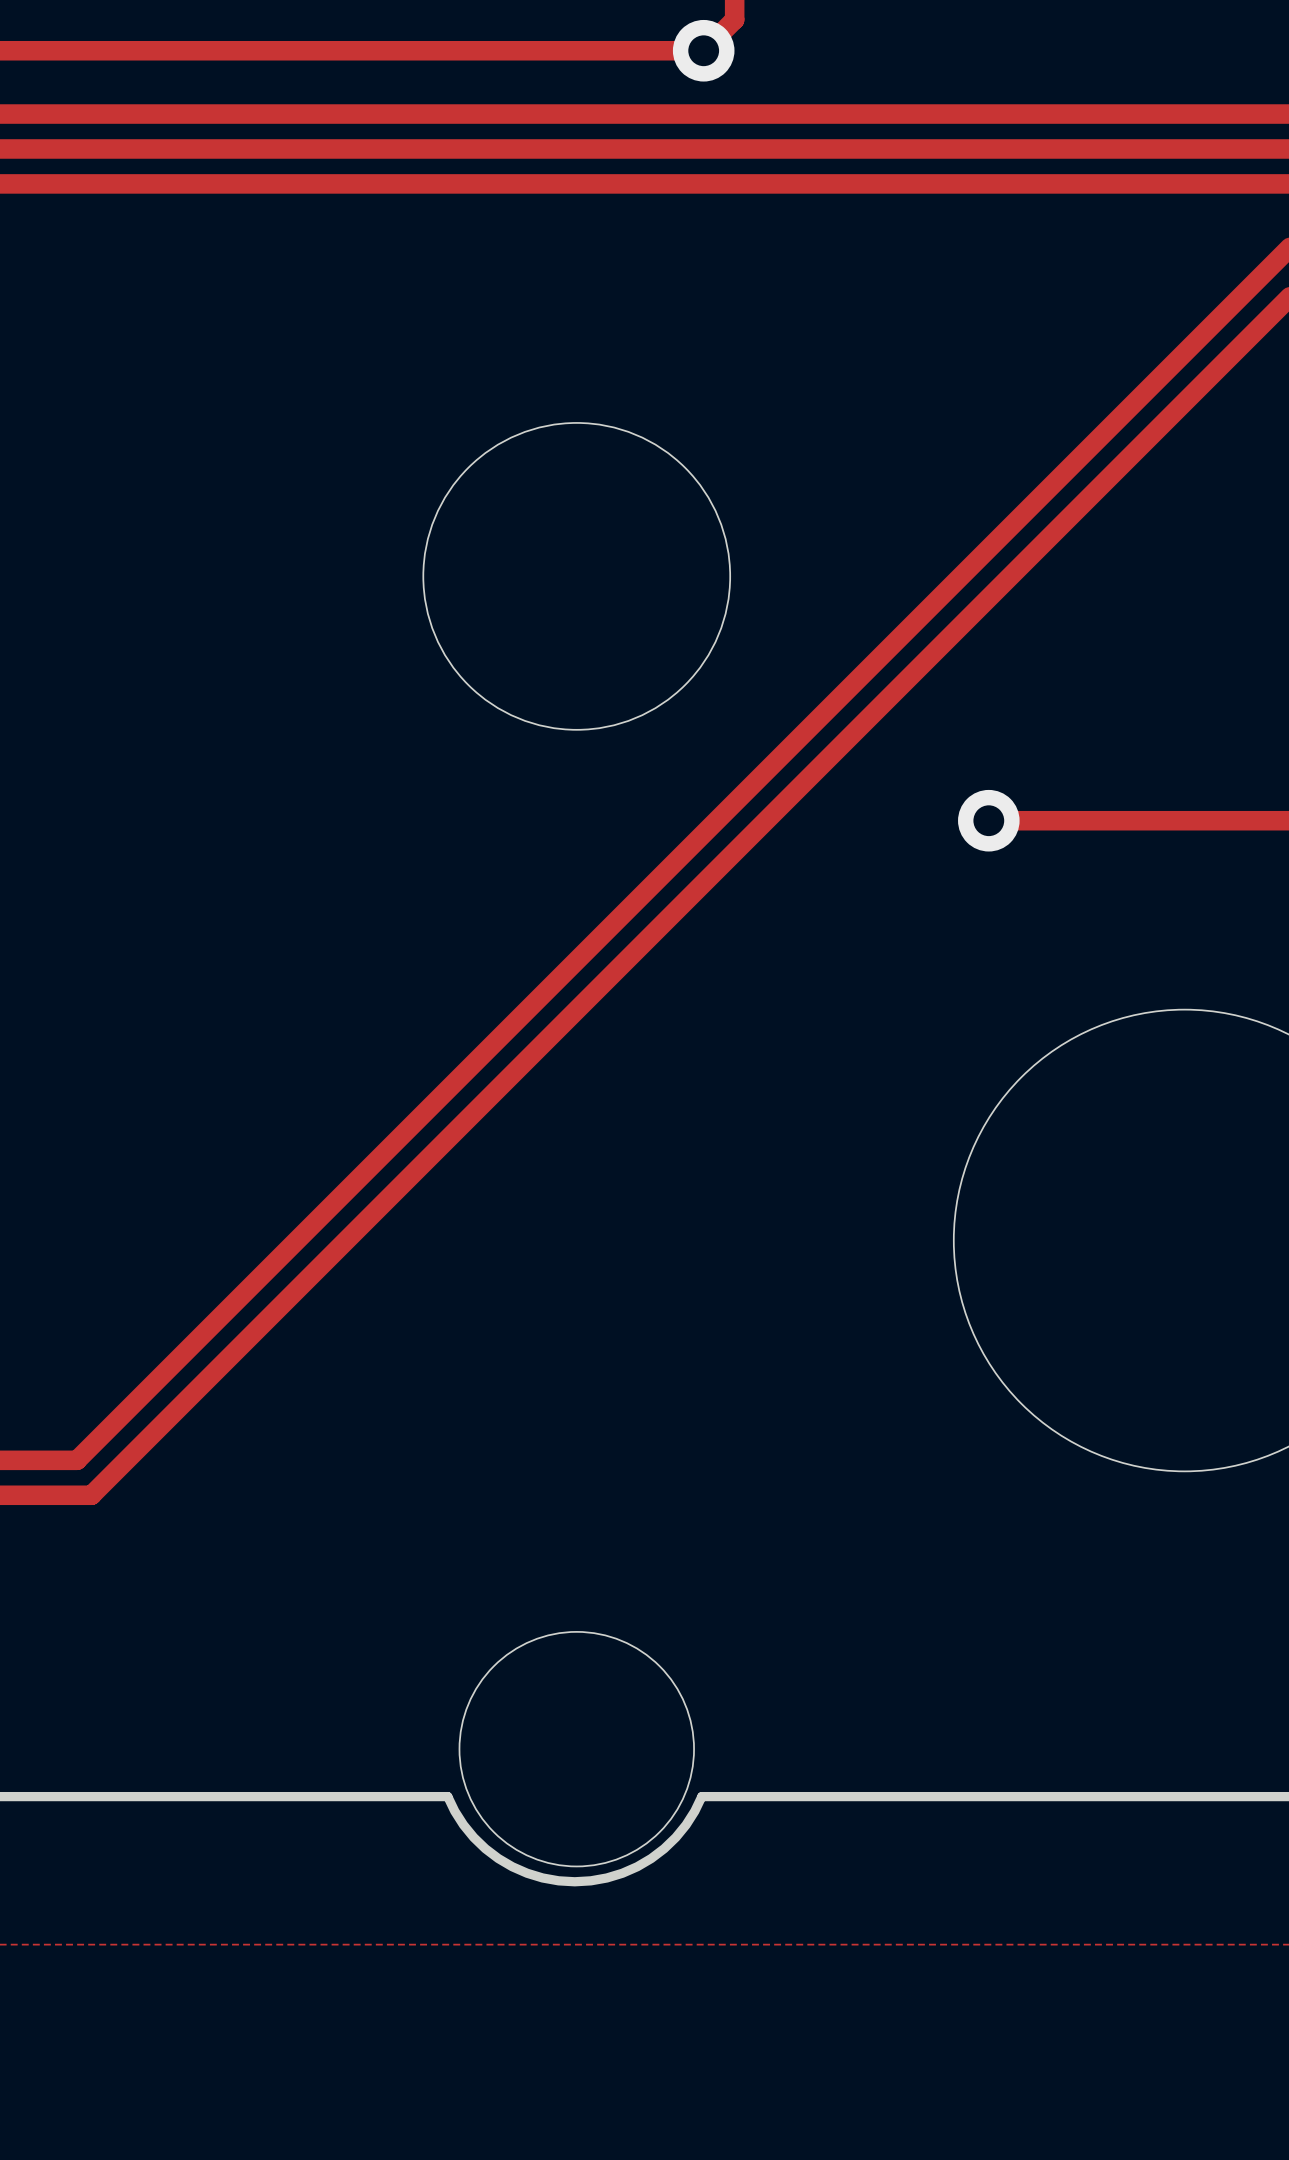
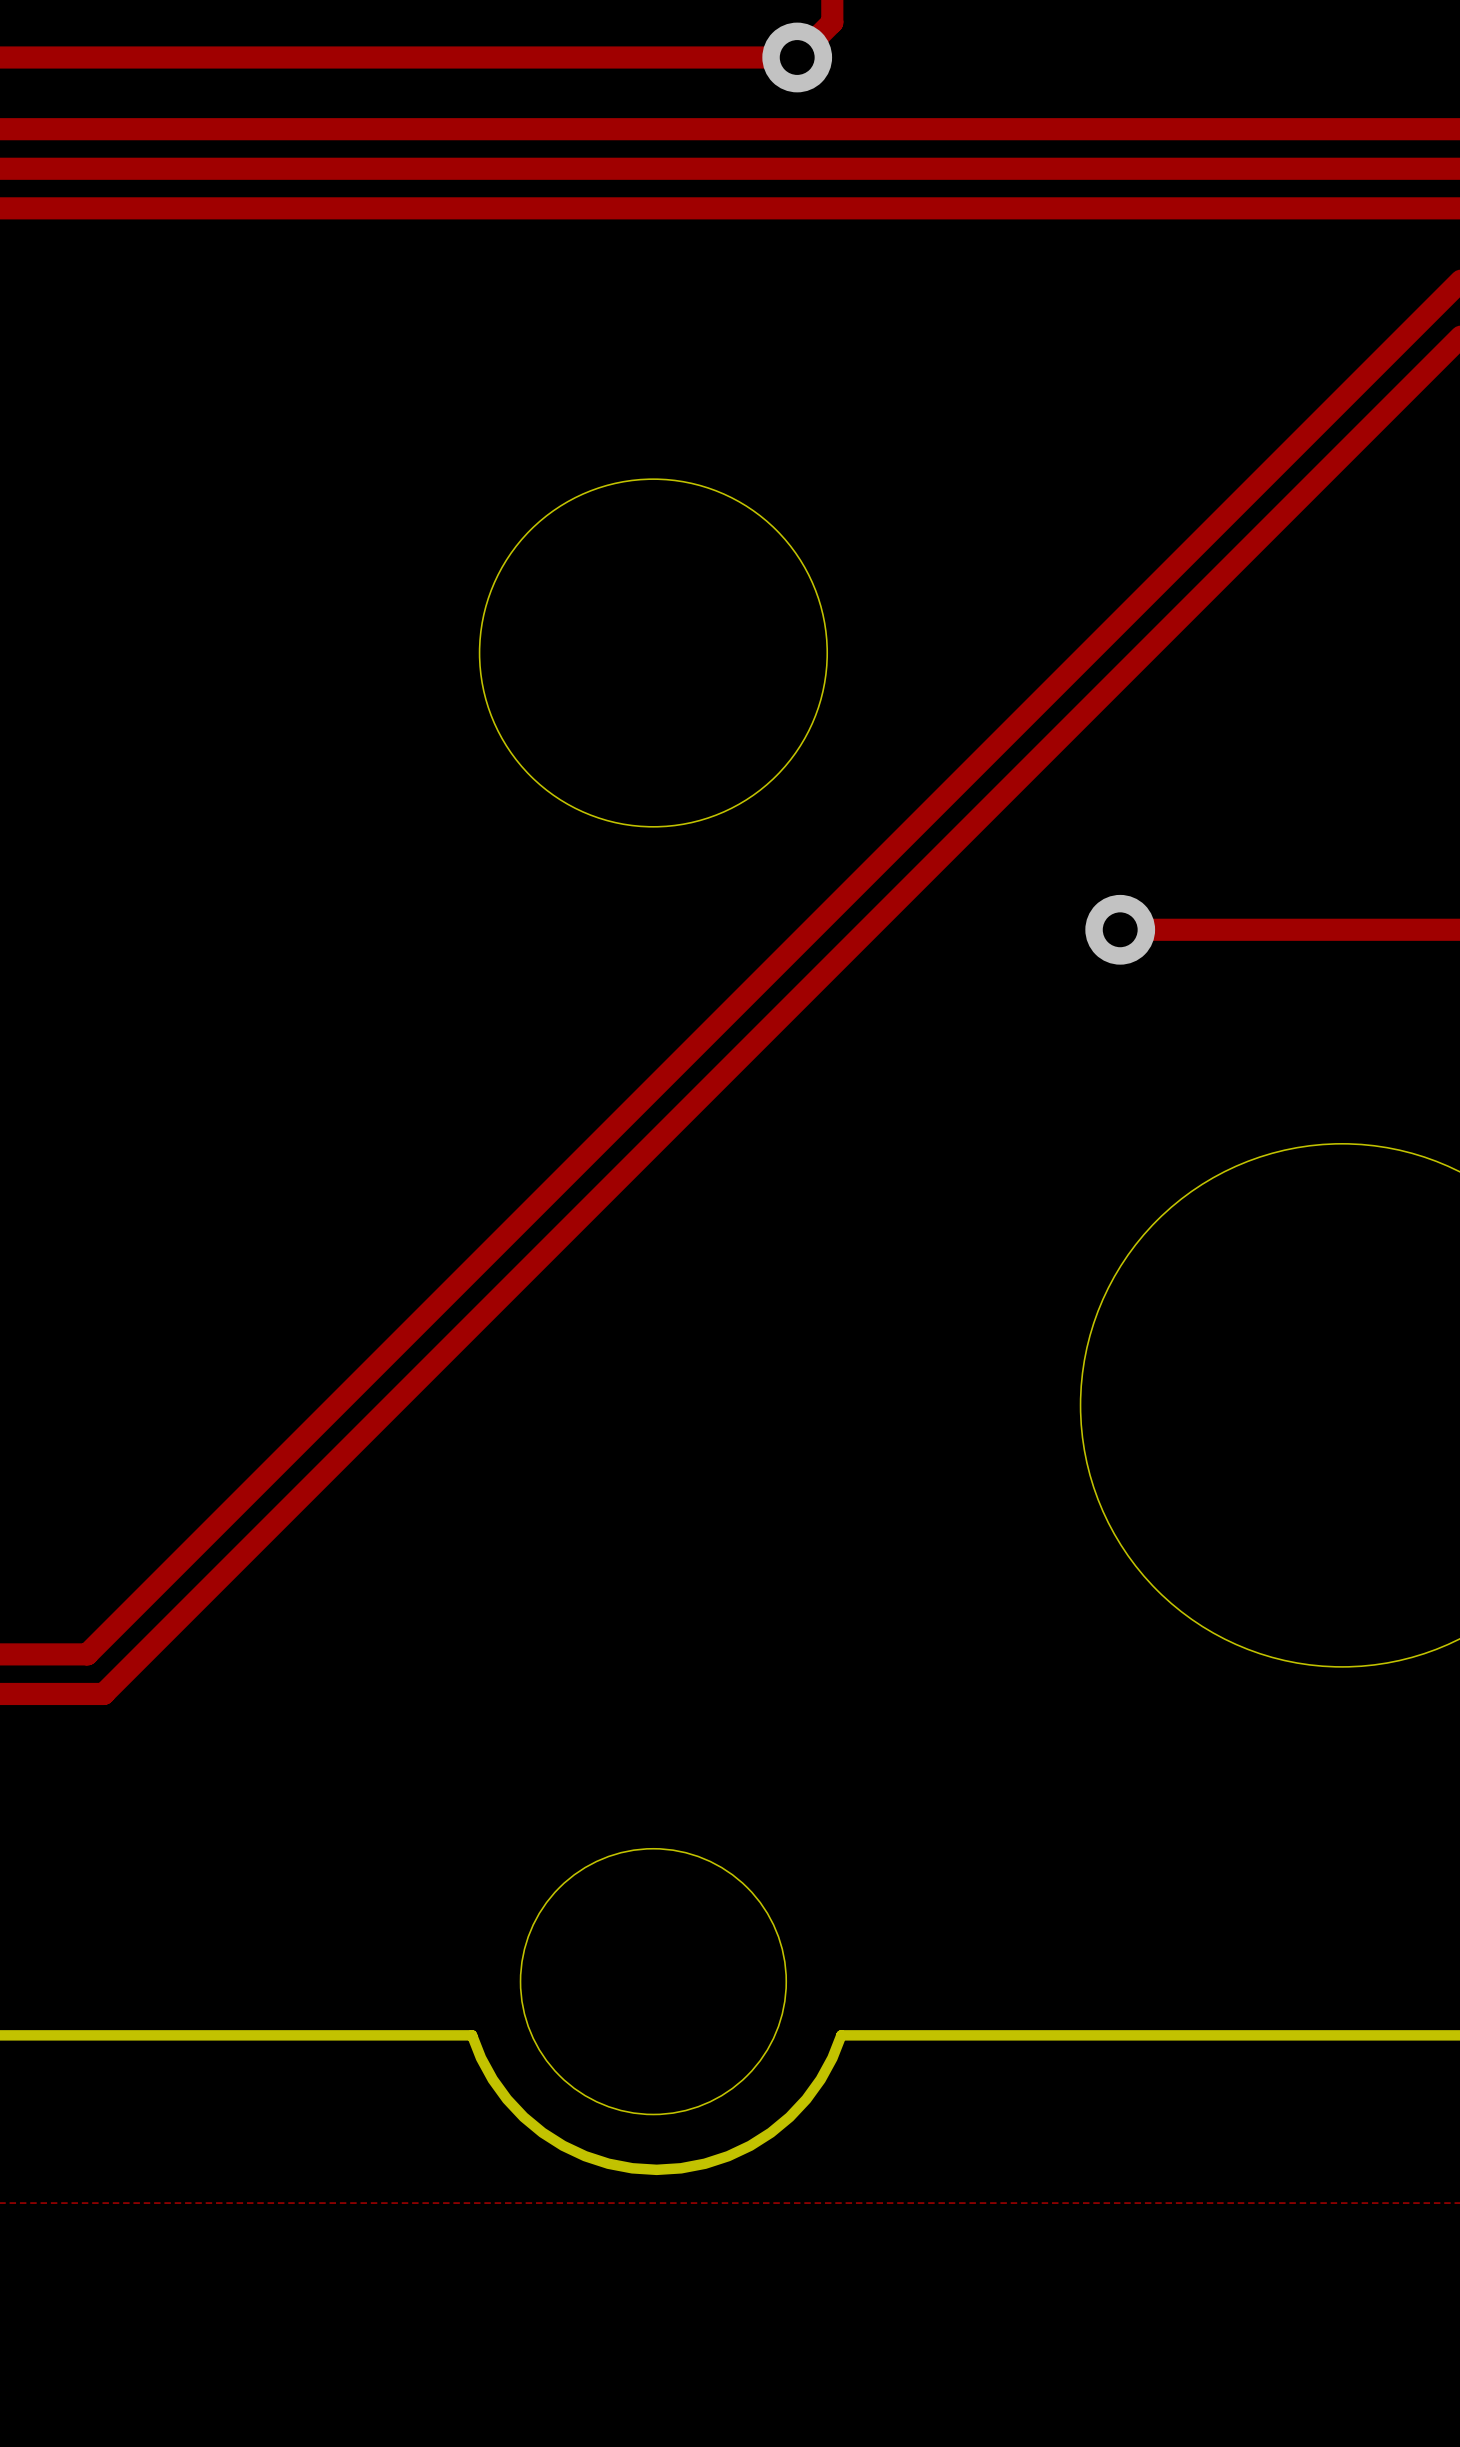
board edge: (416, 1796) (447, 1796) (454, 1811) (473, 1837) (498, 1858) (512, 1866) (542, 1877) (574, 1881) (606, 1877) (622, 1873) (651, 1858) (664, 1848) (686, 1824) (701, 1796) (742, 1796) -> (472, 2035) (481, 2058) (492, 2079) (507, 2099) (523, 2117) (542, 2132) (563, 2145) (585, 2156) (608, 2163) (632, 2168) (656, 2169) (681, 2168) (705, 2163) (728, 2156) (750, 2145) (770, 2132) (789, 2117) (806, 2099) (820, 2079) (832, 2058) (841, 2035)

